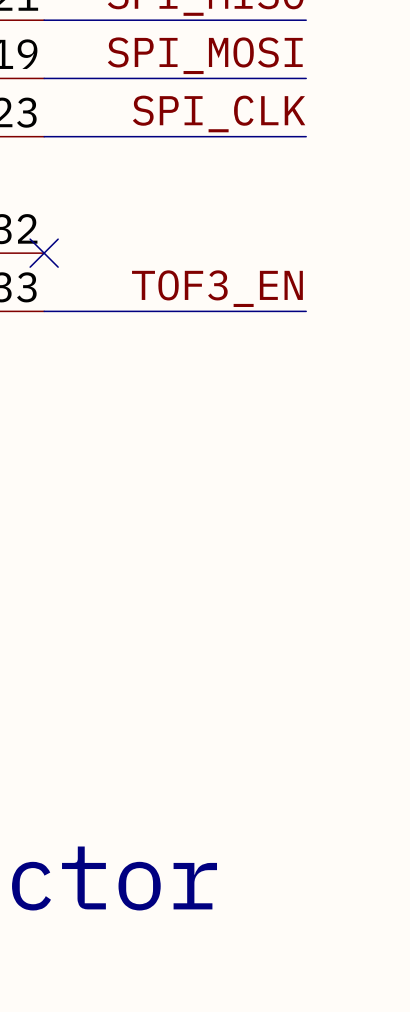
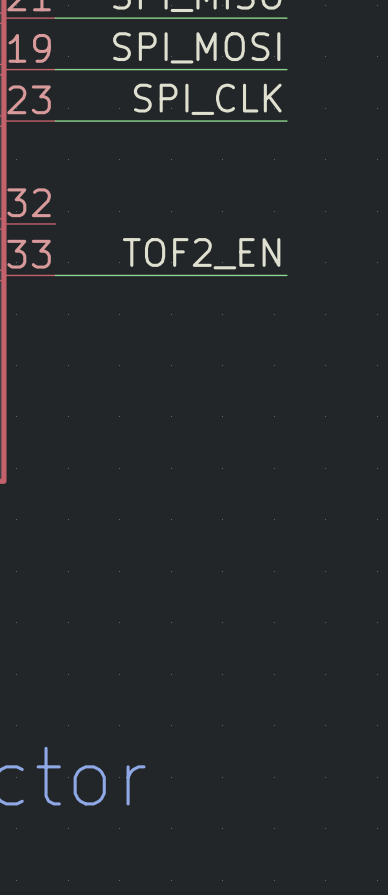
no-connect mark: (44, 253) -> none
label: TOF3_EN (217, 288) -> TOF2_EN (201, 253)

